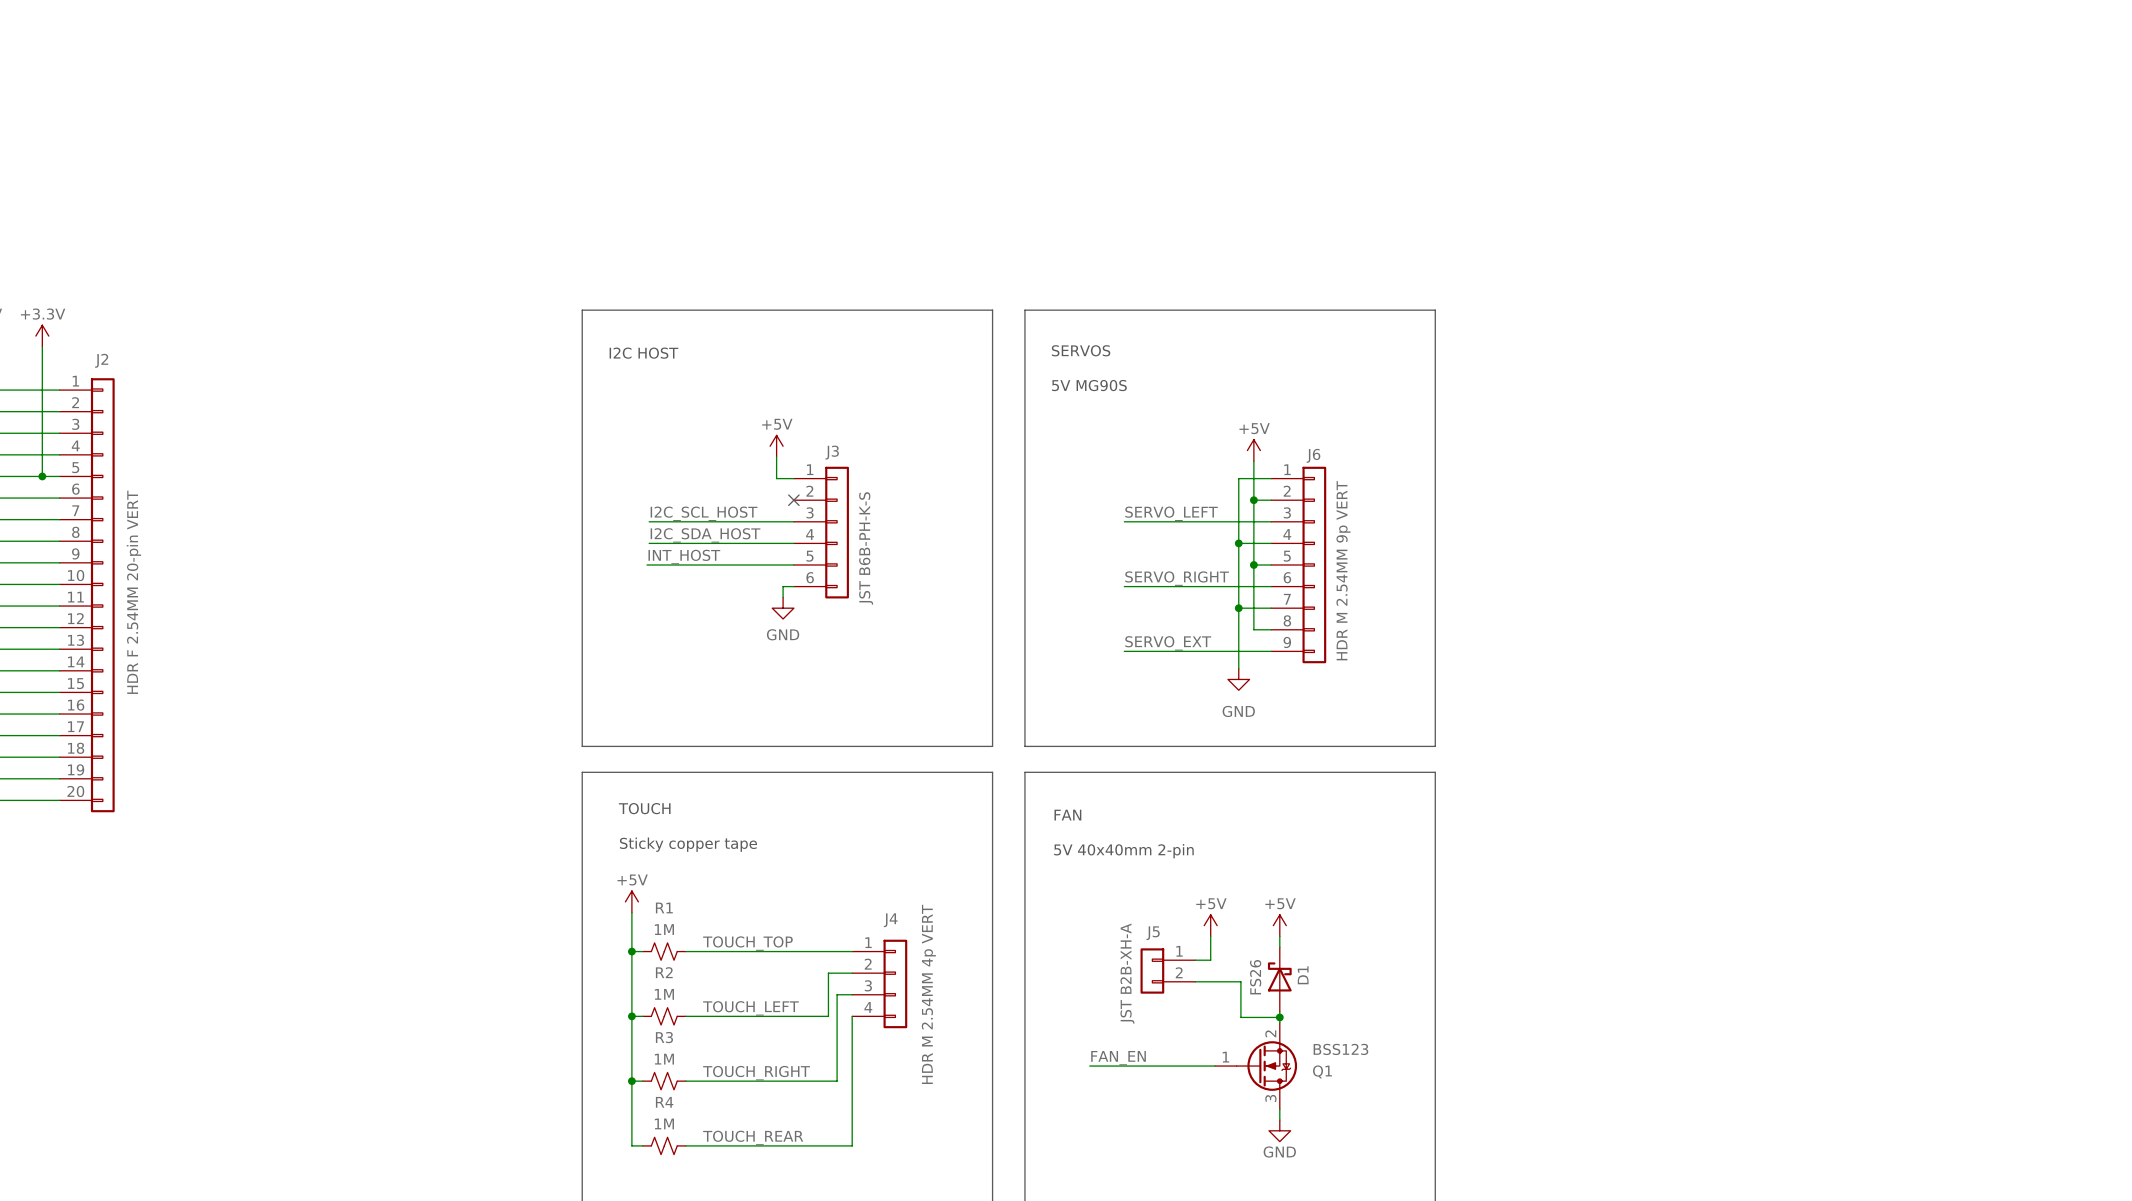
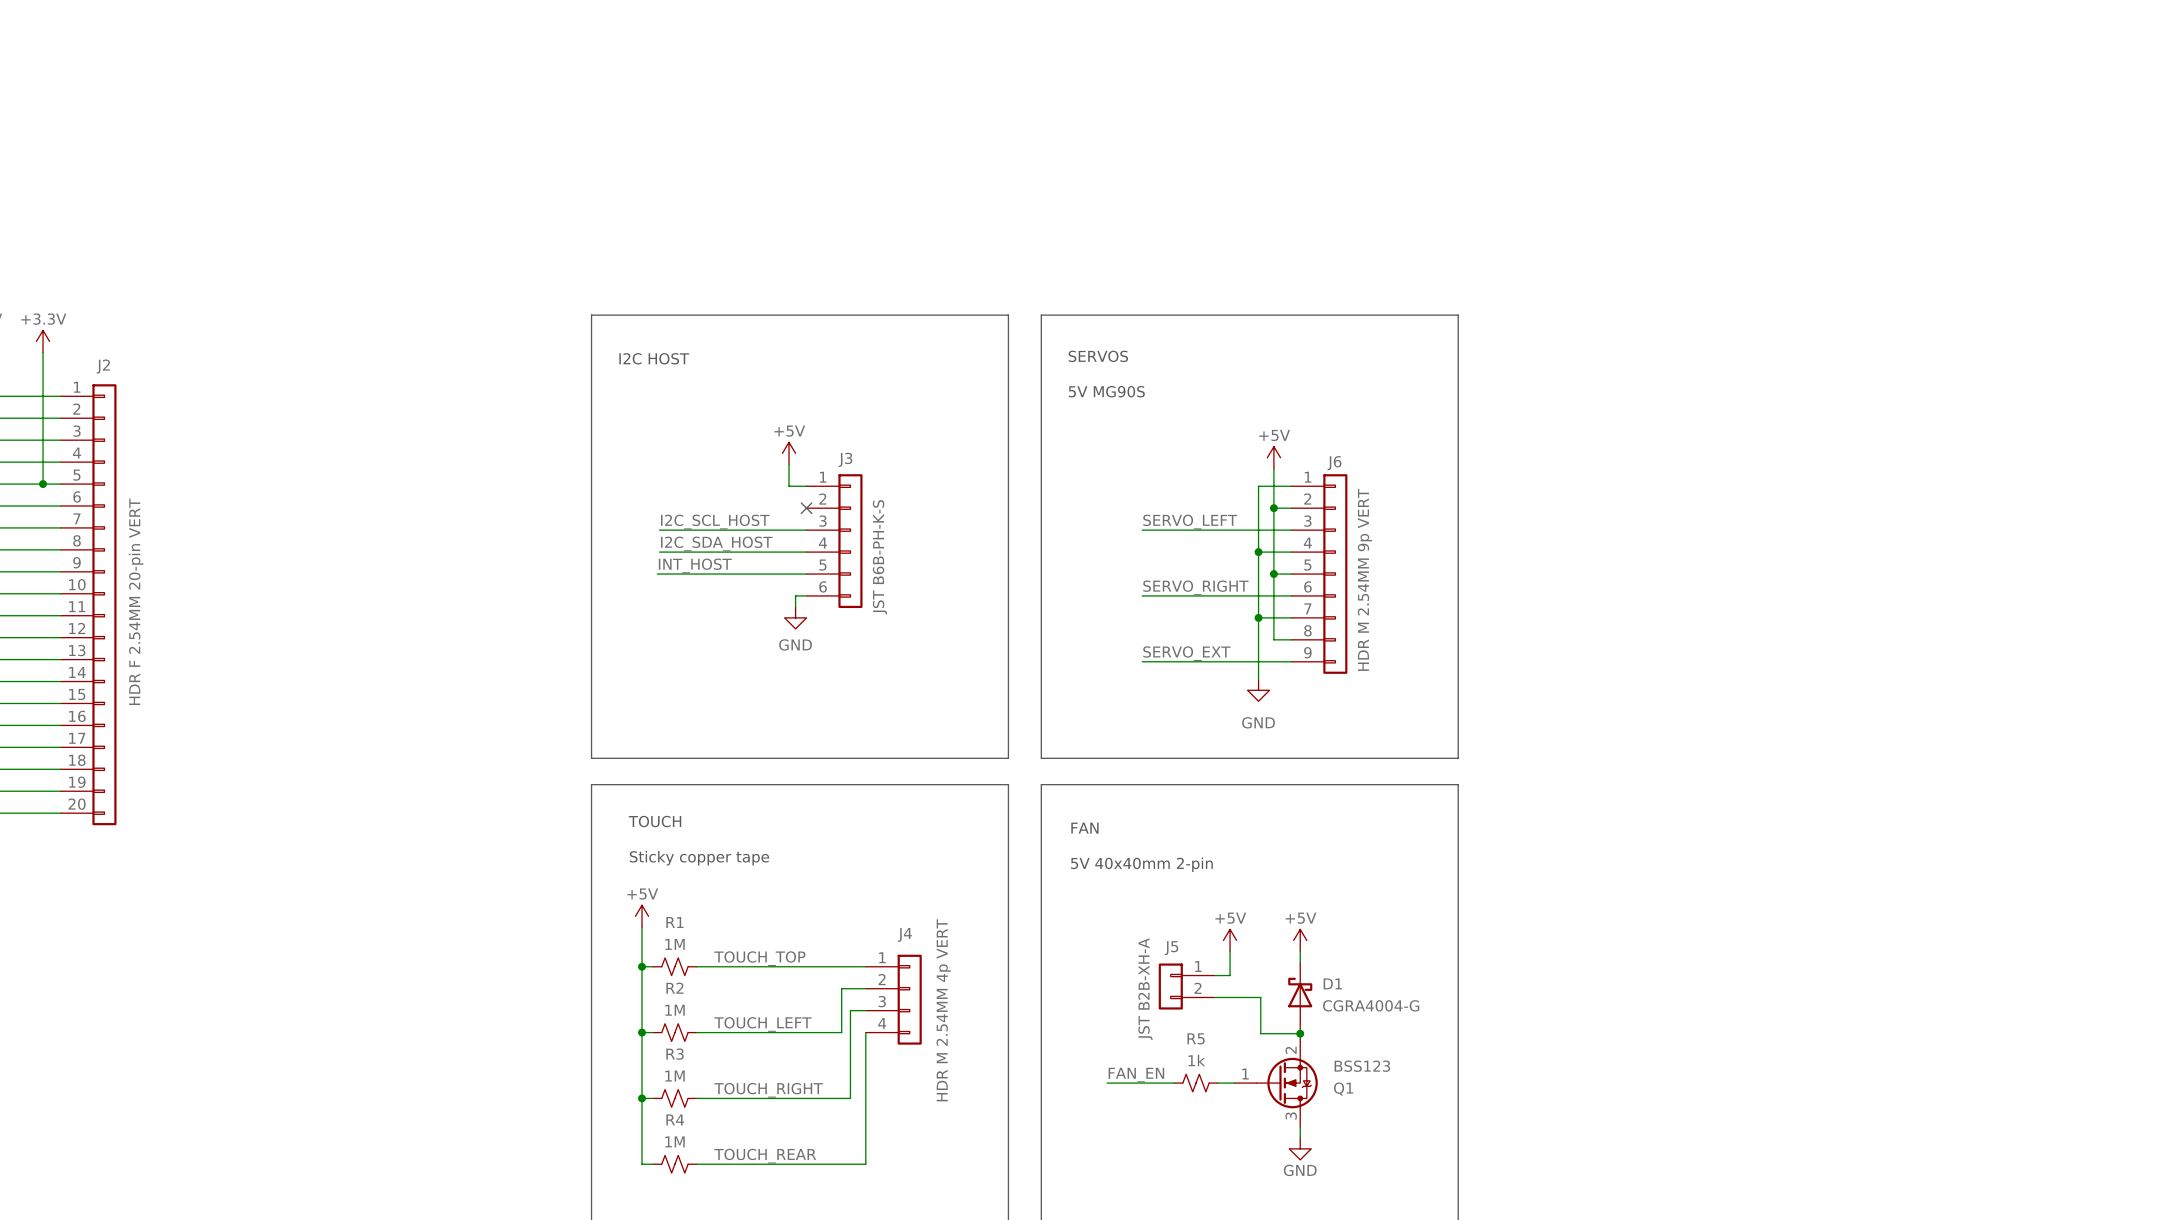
D1 name rotation: 0° (1303, 975) -> 90° clockwise (1332, 983)
D1 value: FS26 (1255, 977) -> CGRA4004-G (1371, 1005)
R5: none -> 1k (1196, 1083)

